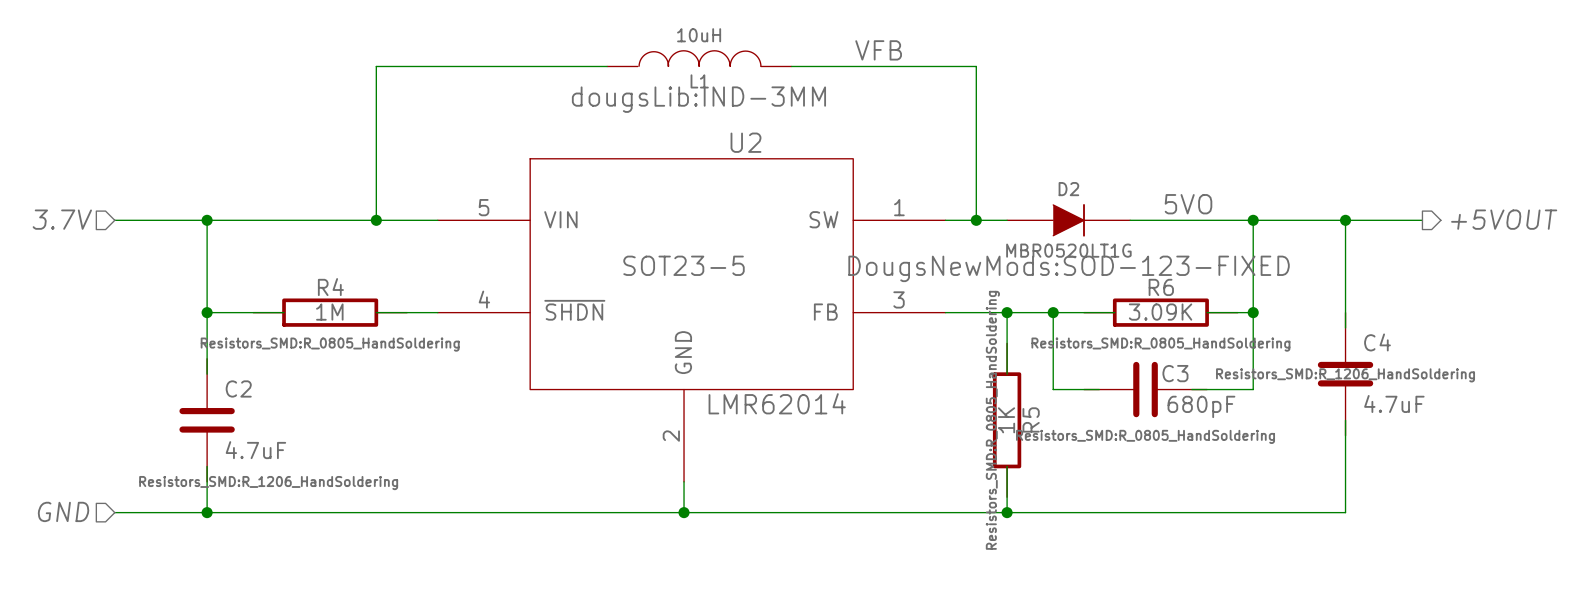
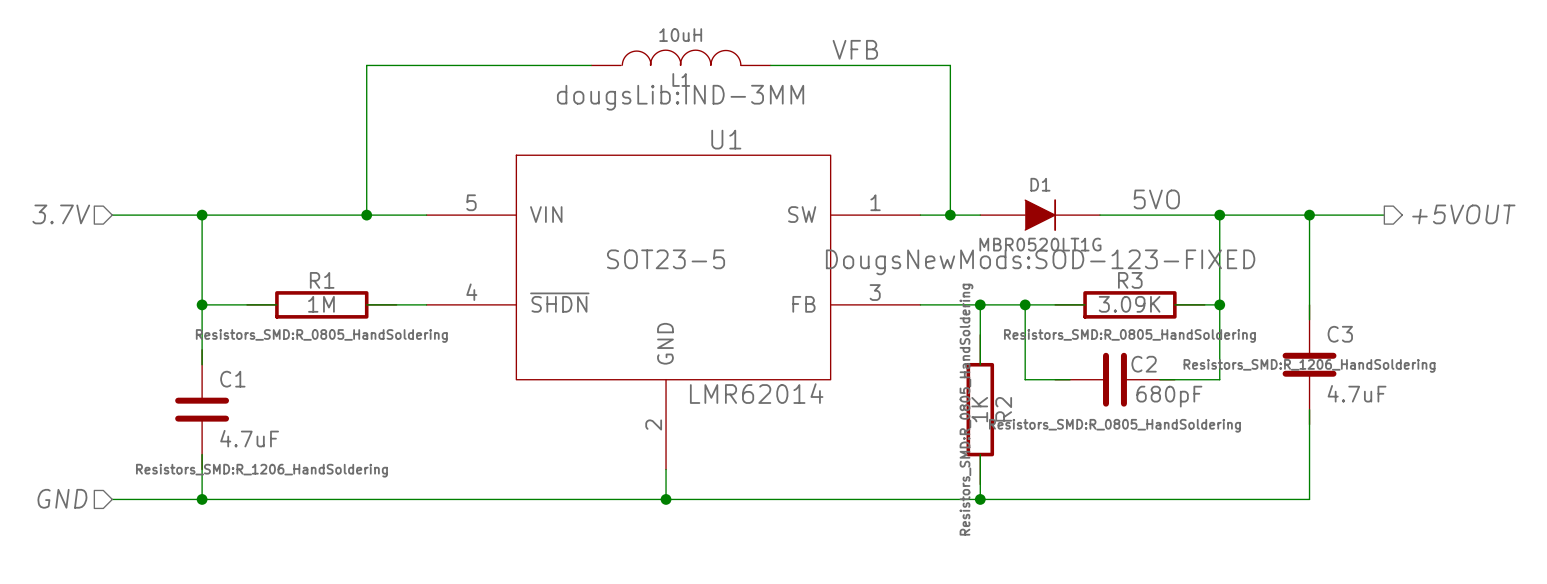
U2 name: U2 (745, 142) -> U1 (726, 139)
D2 name: D2 (1068, 189) -> D1 (1040, 184)
R4 name: R4 (330, 287) -> R1 (322, 280)
R6 name: R6 (1161, 287) -> R3 (1130, 280)
C4 name: C4 (1377, 342) -> C3 (1340, 334)
C3 name: C3 (1175, 373) -> C2 (1144, 364)
C2 name: C2 (238, 388) -> C1 (232, 379)
R5 name: R5 (1031, 419) -> R2 (1003, 409)

